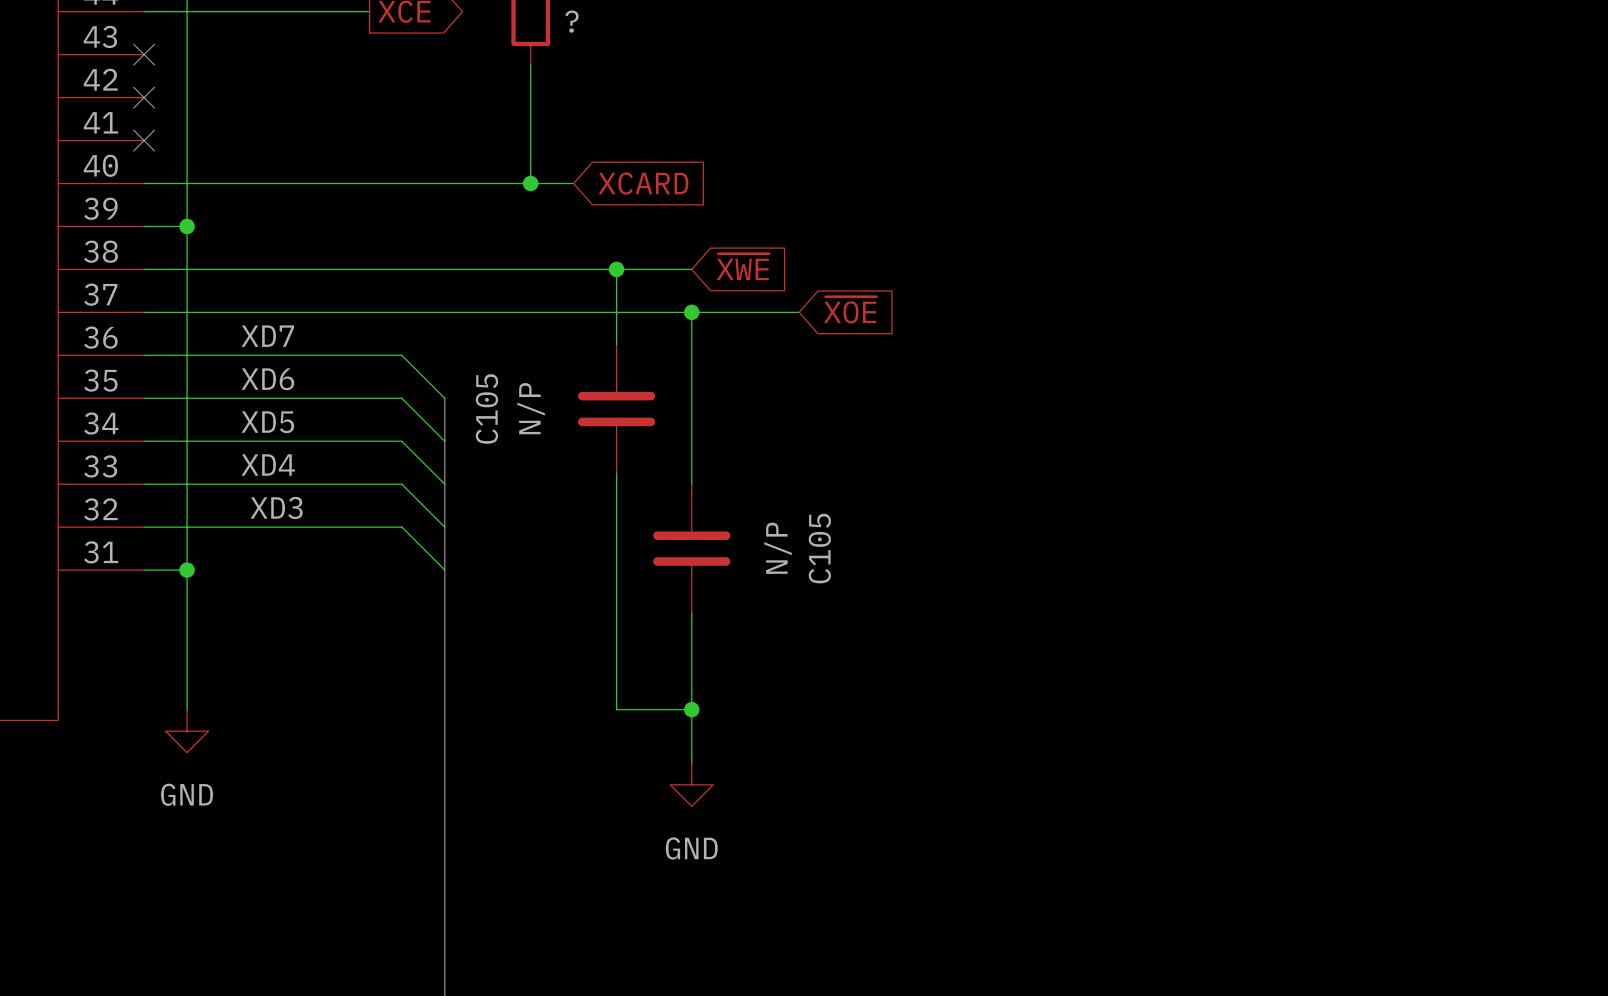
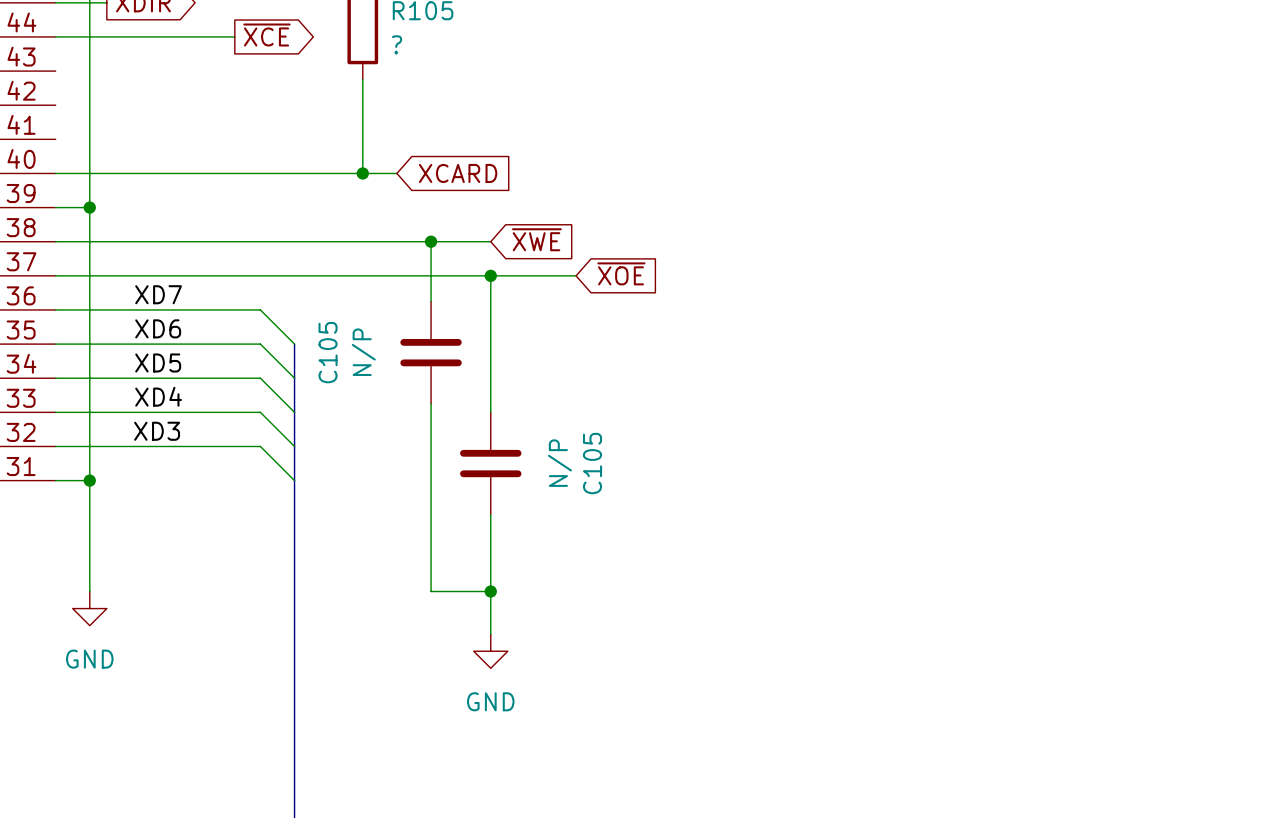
no-connect mark: (144, 54) -> none
no-connect mark: (144, 97) -> none
no-connect mark: (144, 140) -> none

